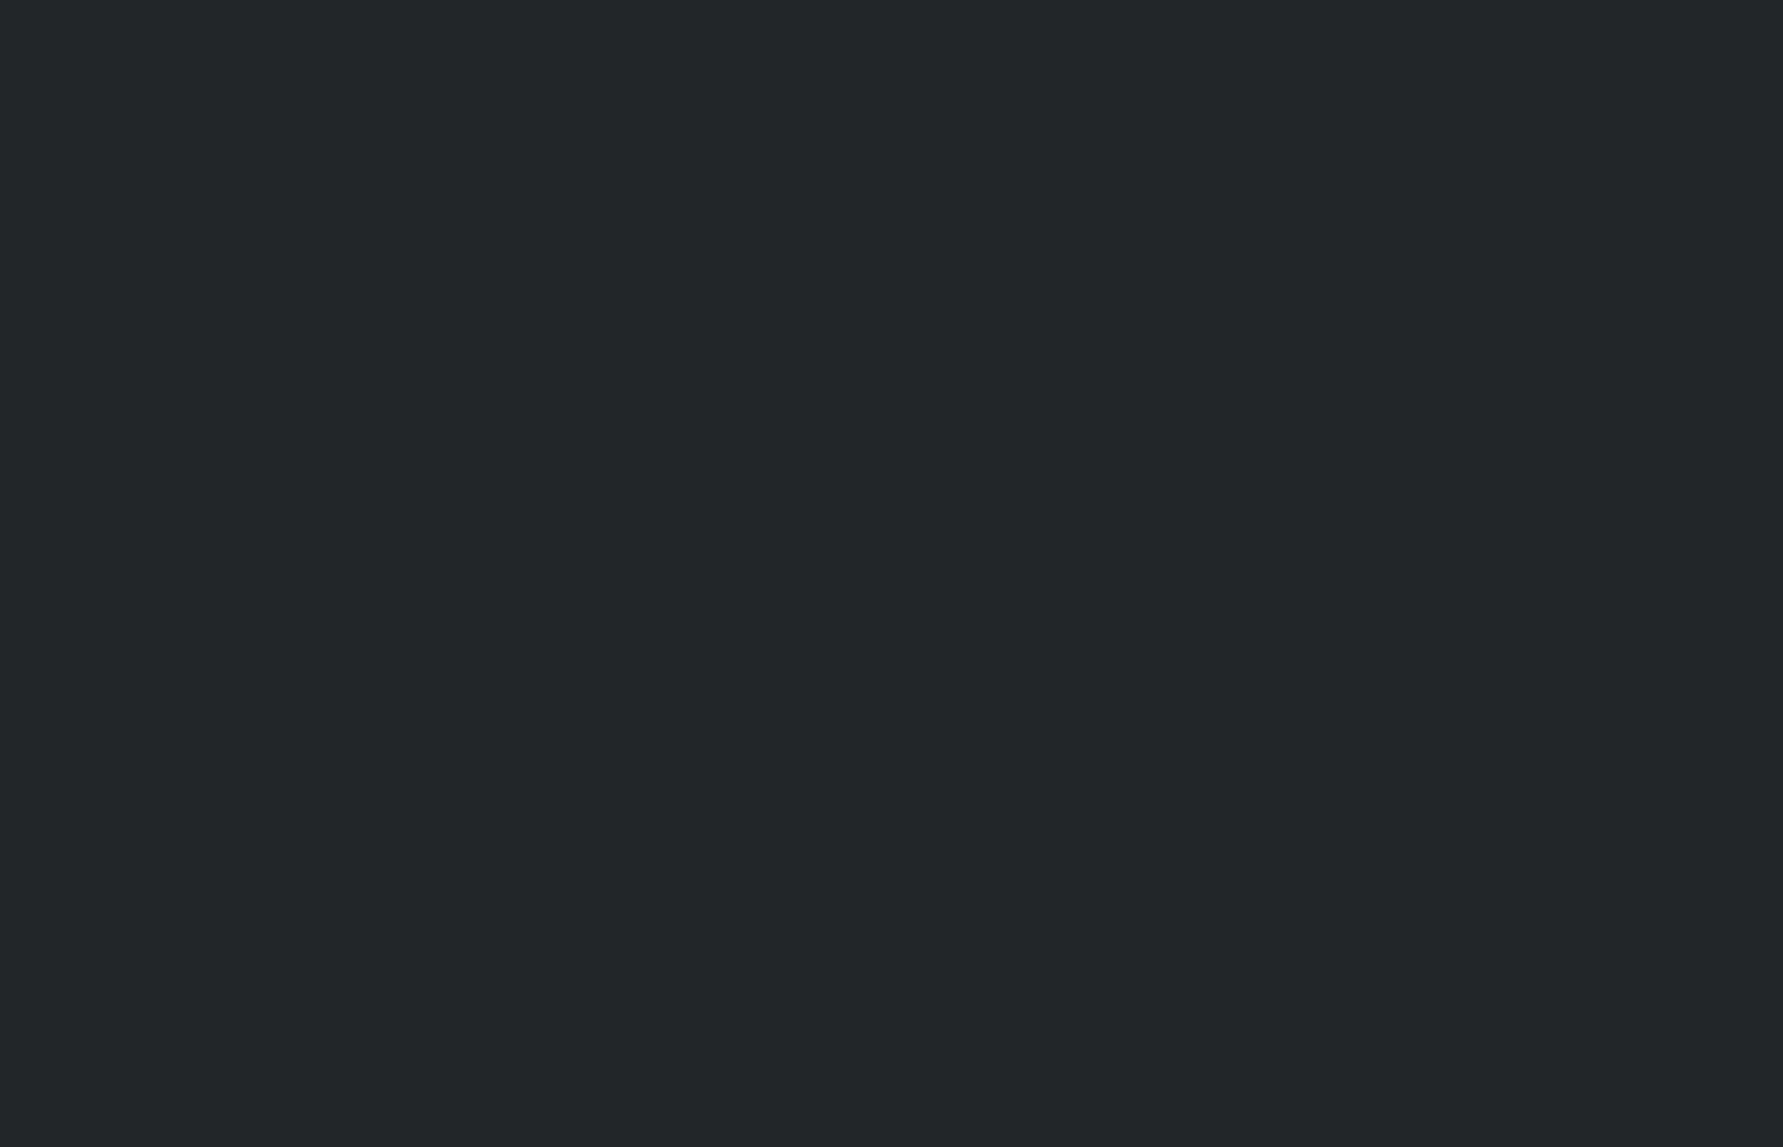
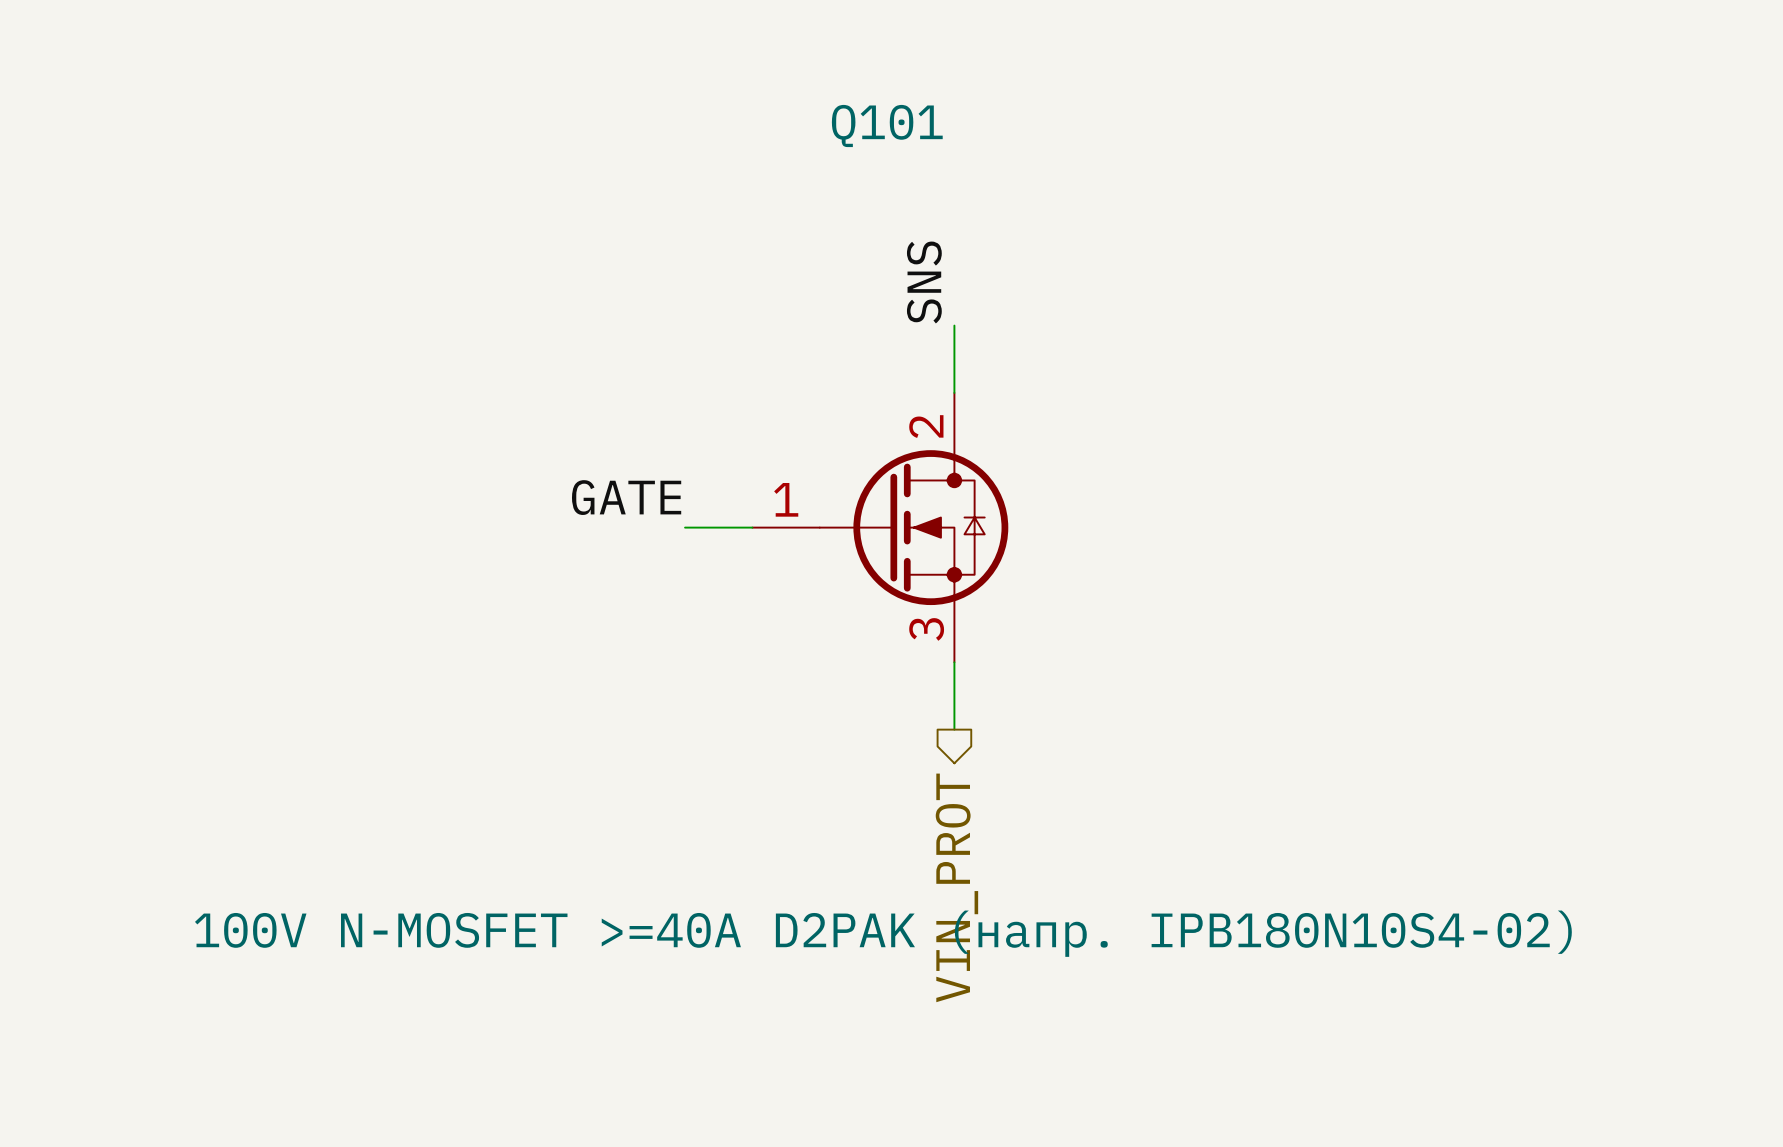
label: none -> SNS (924, 282)
wire: none -> (954, 325) (954, 392)
label: none -> GATE (626, 497)
wire: none -> (685, 527) (752, 527)
Q101: none -> 100V N-MOSFET >=40A D2PAK (напр. IPB180N10S4-02) (880, 527)
wire: none -> (954, 662) (954, 729)
hierarchical label: none -> VIN_PROT (956, 887)

